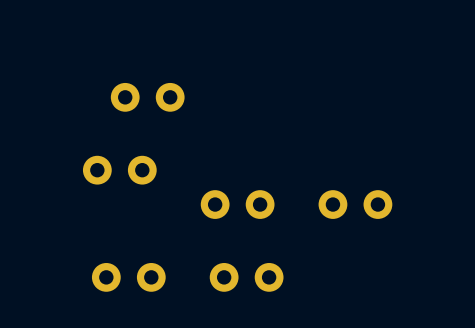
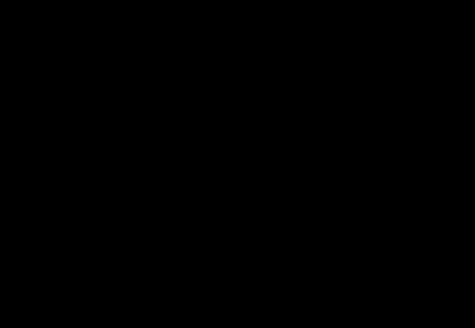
part: (147, 97) -> none
part: (119, 170) -> none
part: (237, 204) -> none
part: (355, 204) -> none
part: (128, 277) -> none
part: (246, 277) -> none

